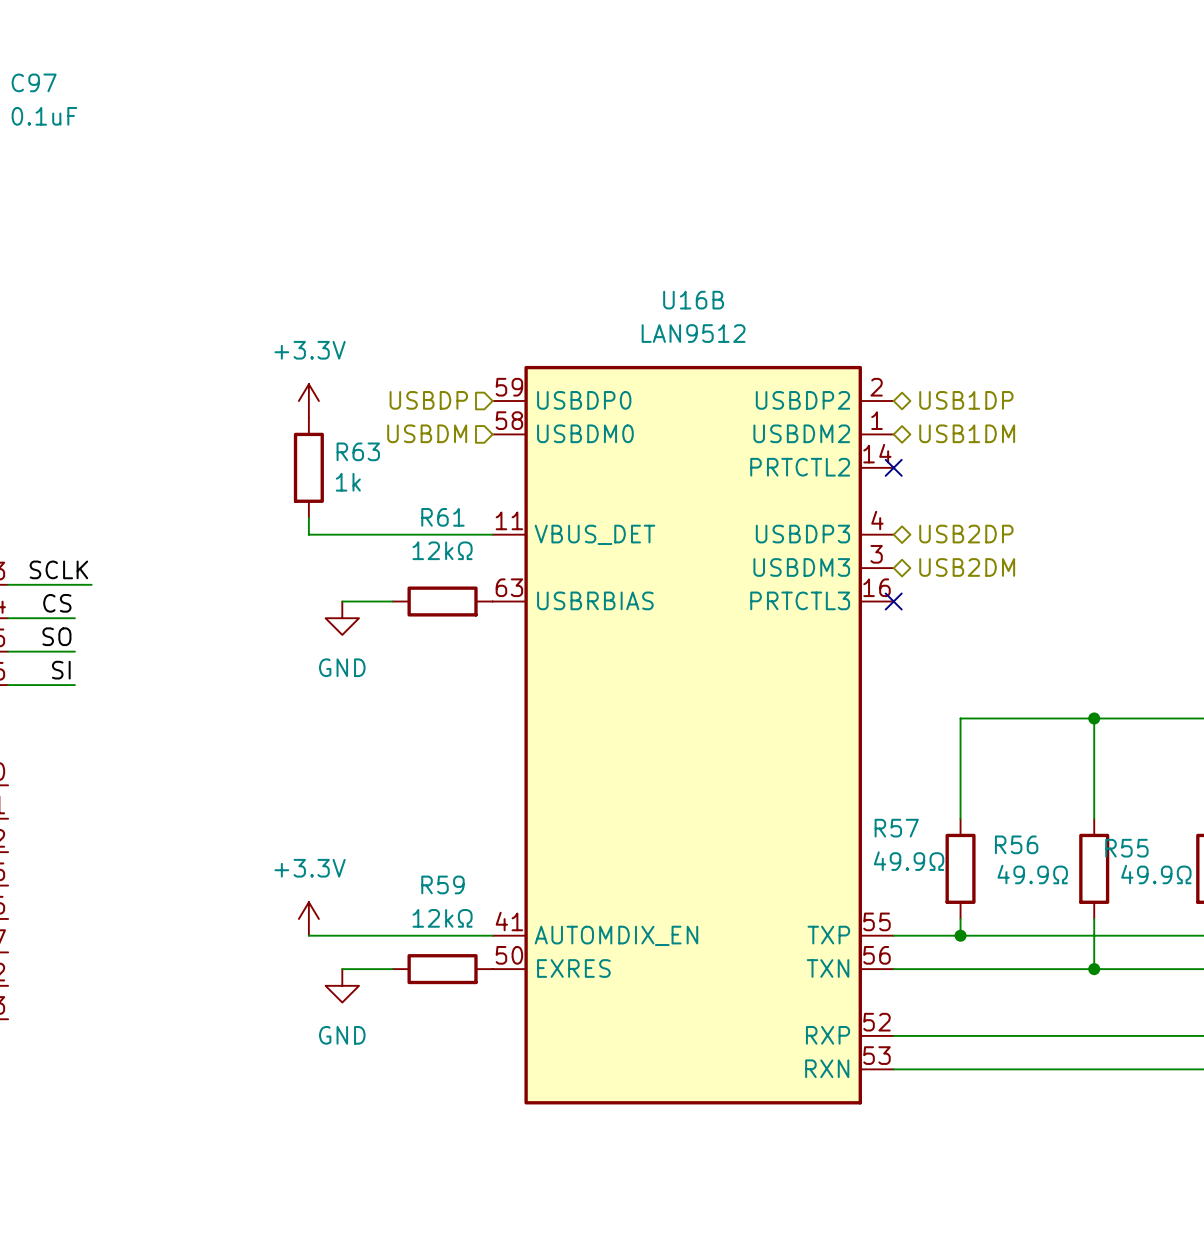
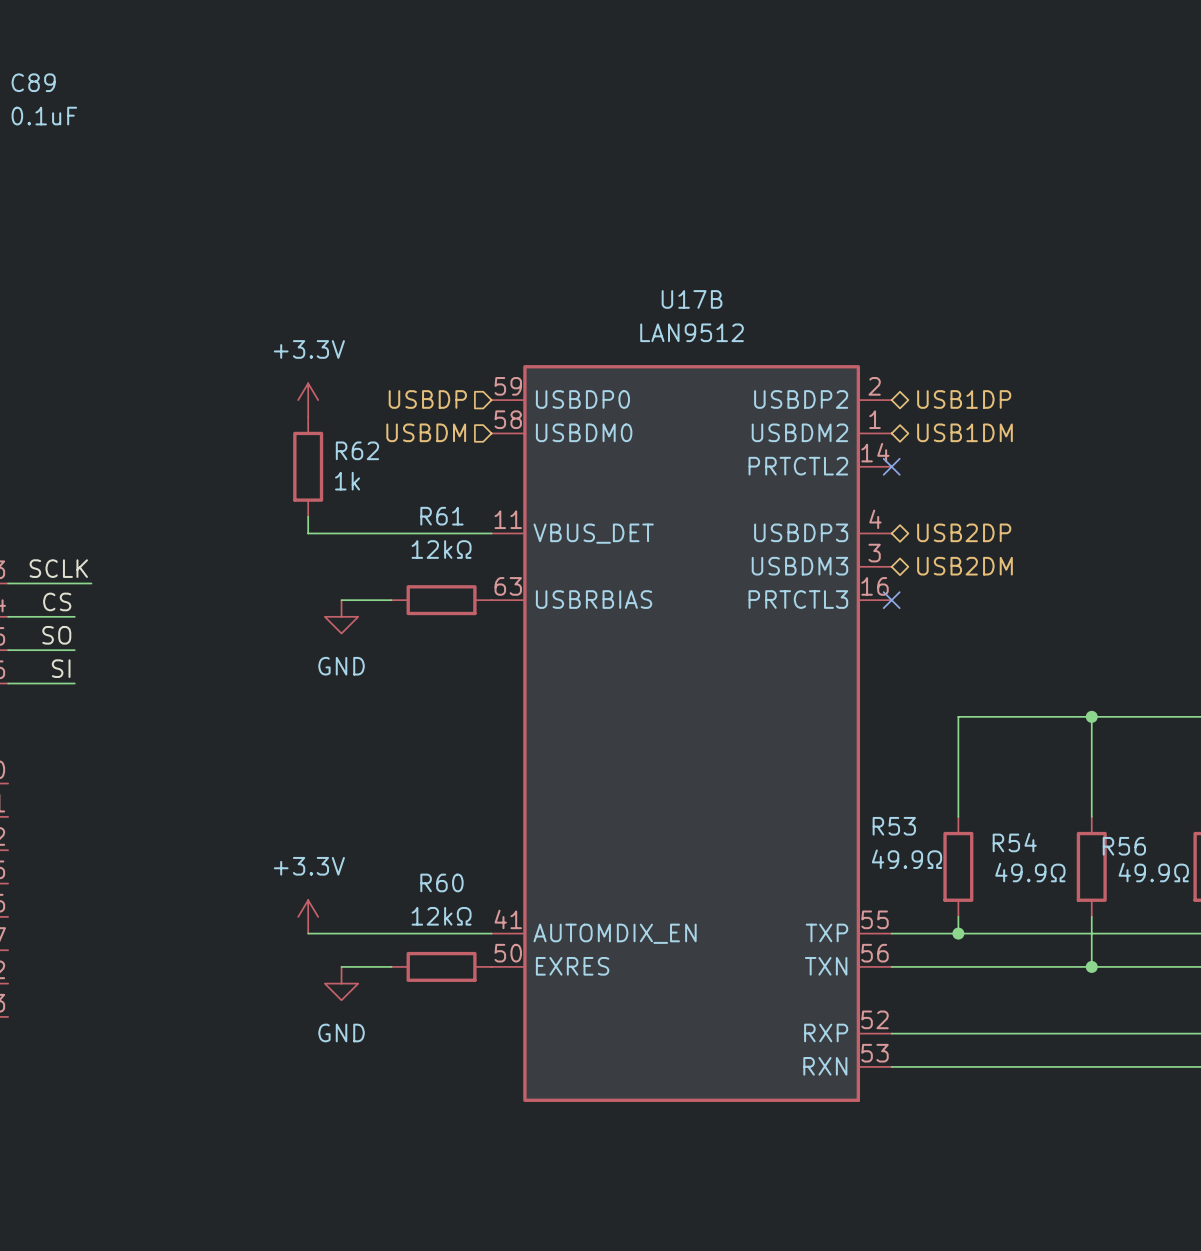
C97 name: C97 (34, 82) -> C89 (33, 82)
U16B name: U16B (693, 300) -> U17B (692, 299)
R63 name: R63 (358, 451) -> R62 (357, 450)
R57 name: R57 (896, 828) -> R53 (894, 826)
R56 name: R56 (1016, 844) -> R54 (1014, 842)
R55 name: R55 (1126, 848) -> R56 (1124, 846)
R59 name: R59 (442, 884) -> R60 (441, 882)

